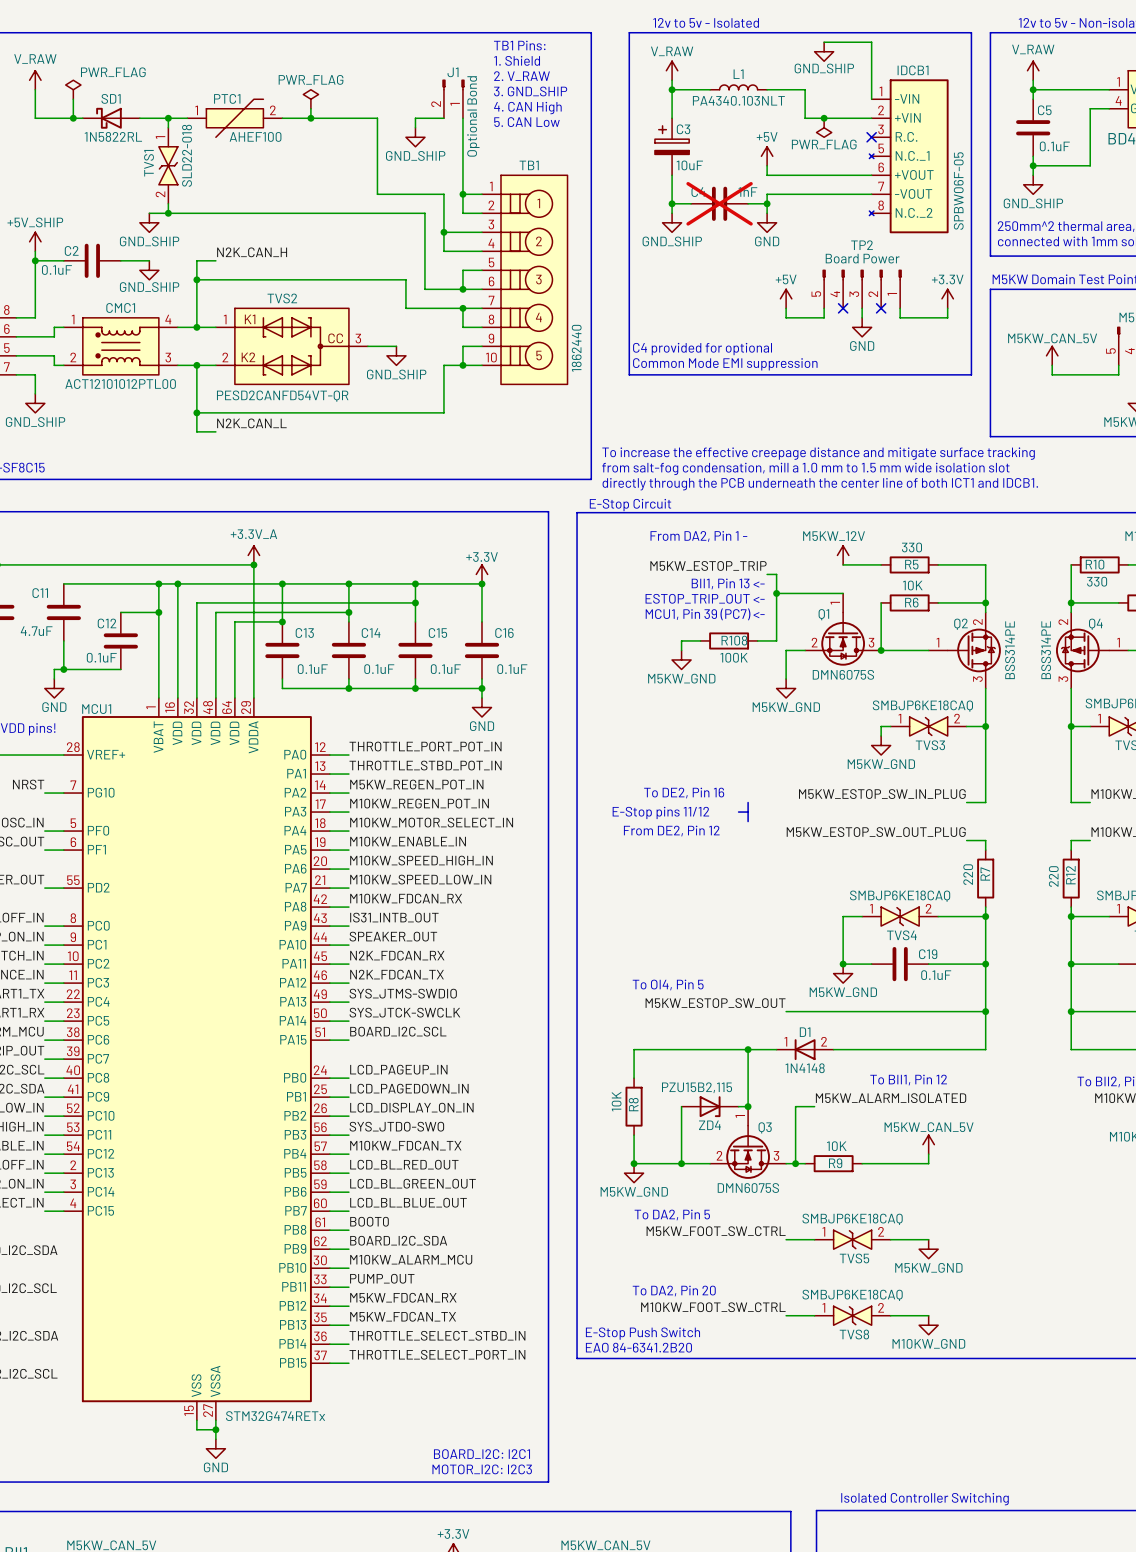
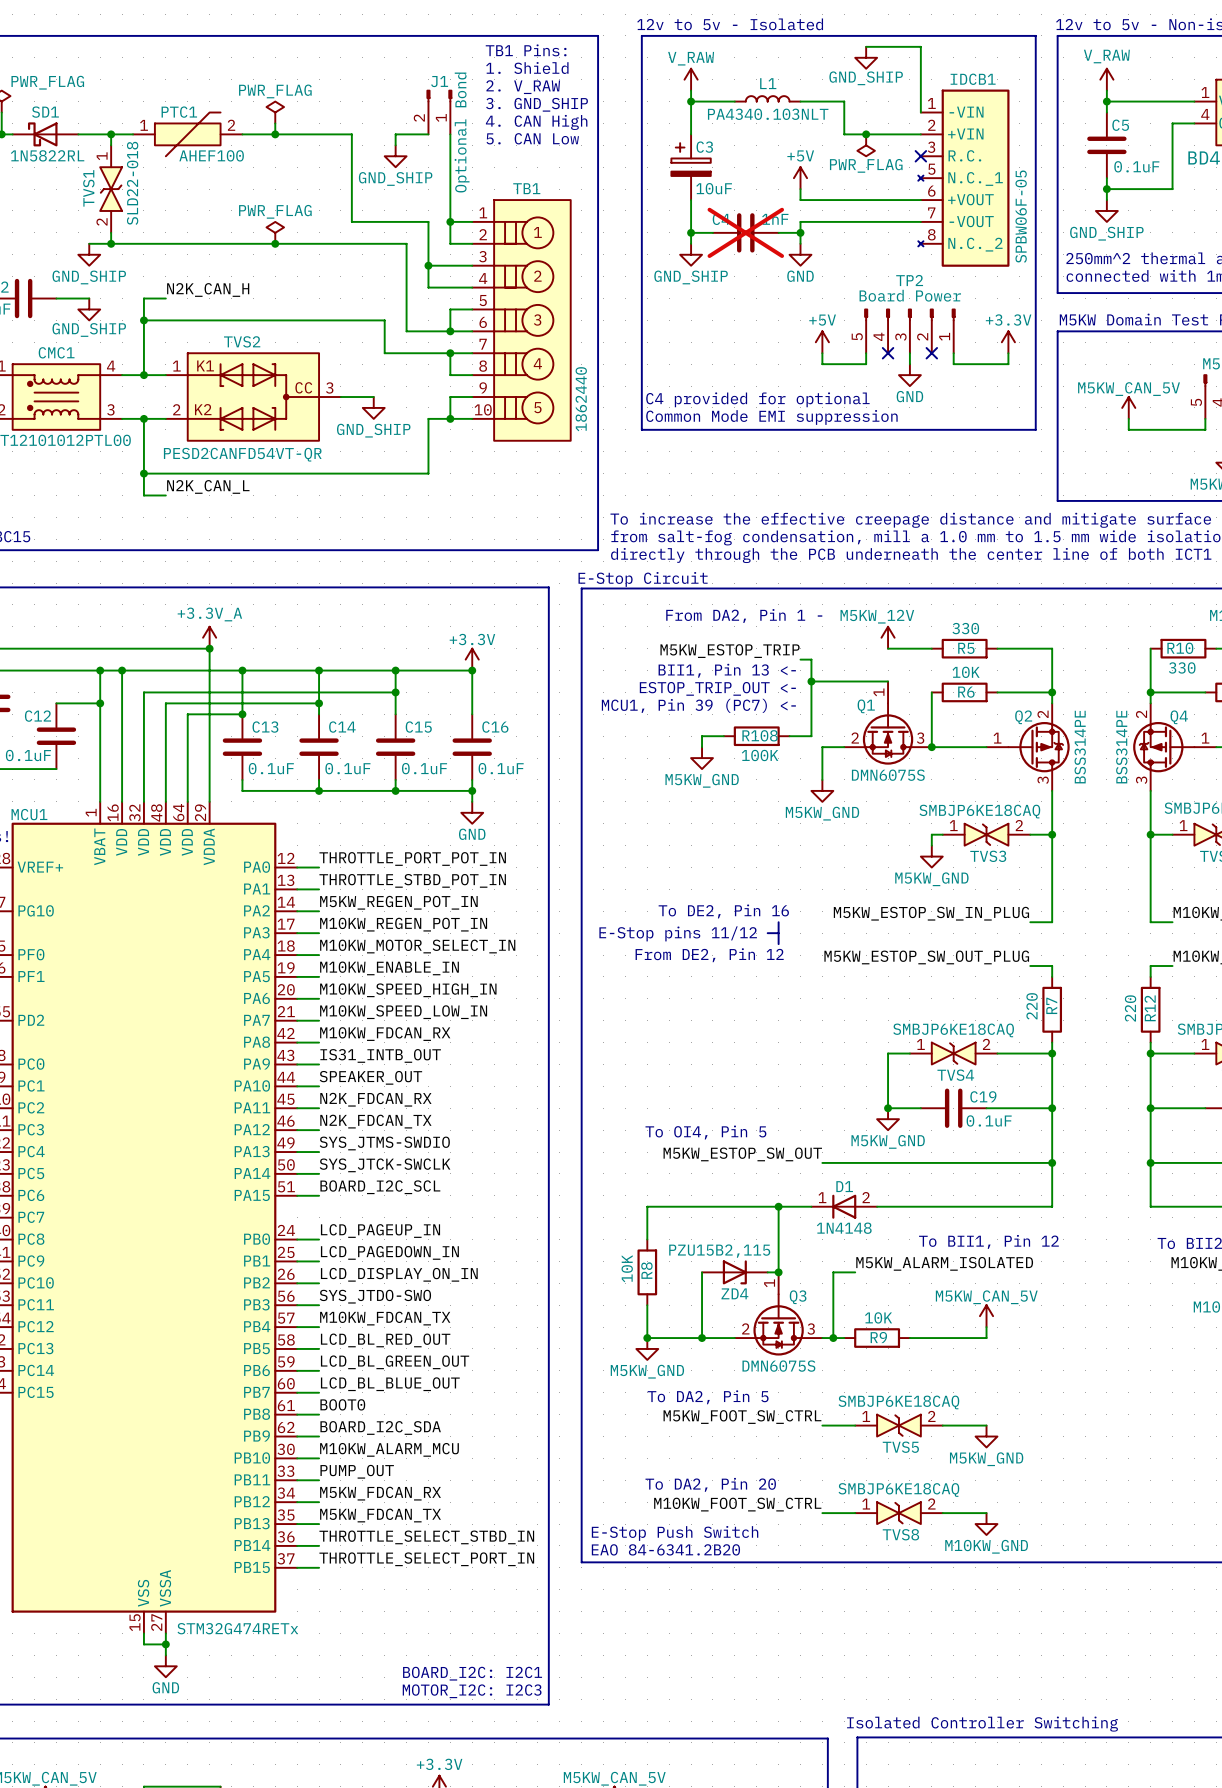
power symbol: none -> PWR_FLAG (275, 232)
junction: none -> (275, 243)

